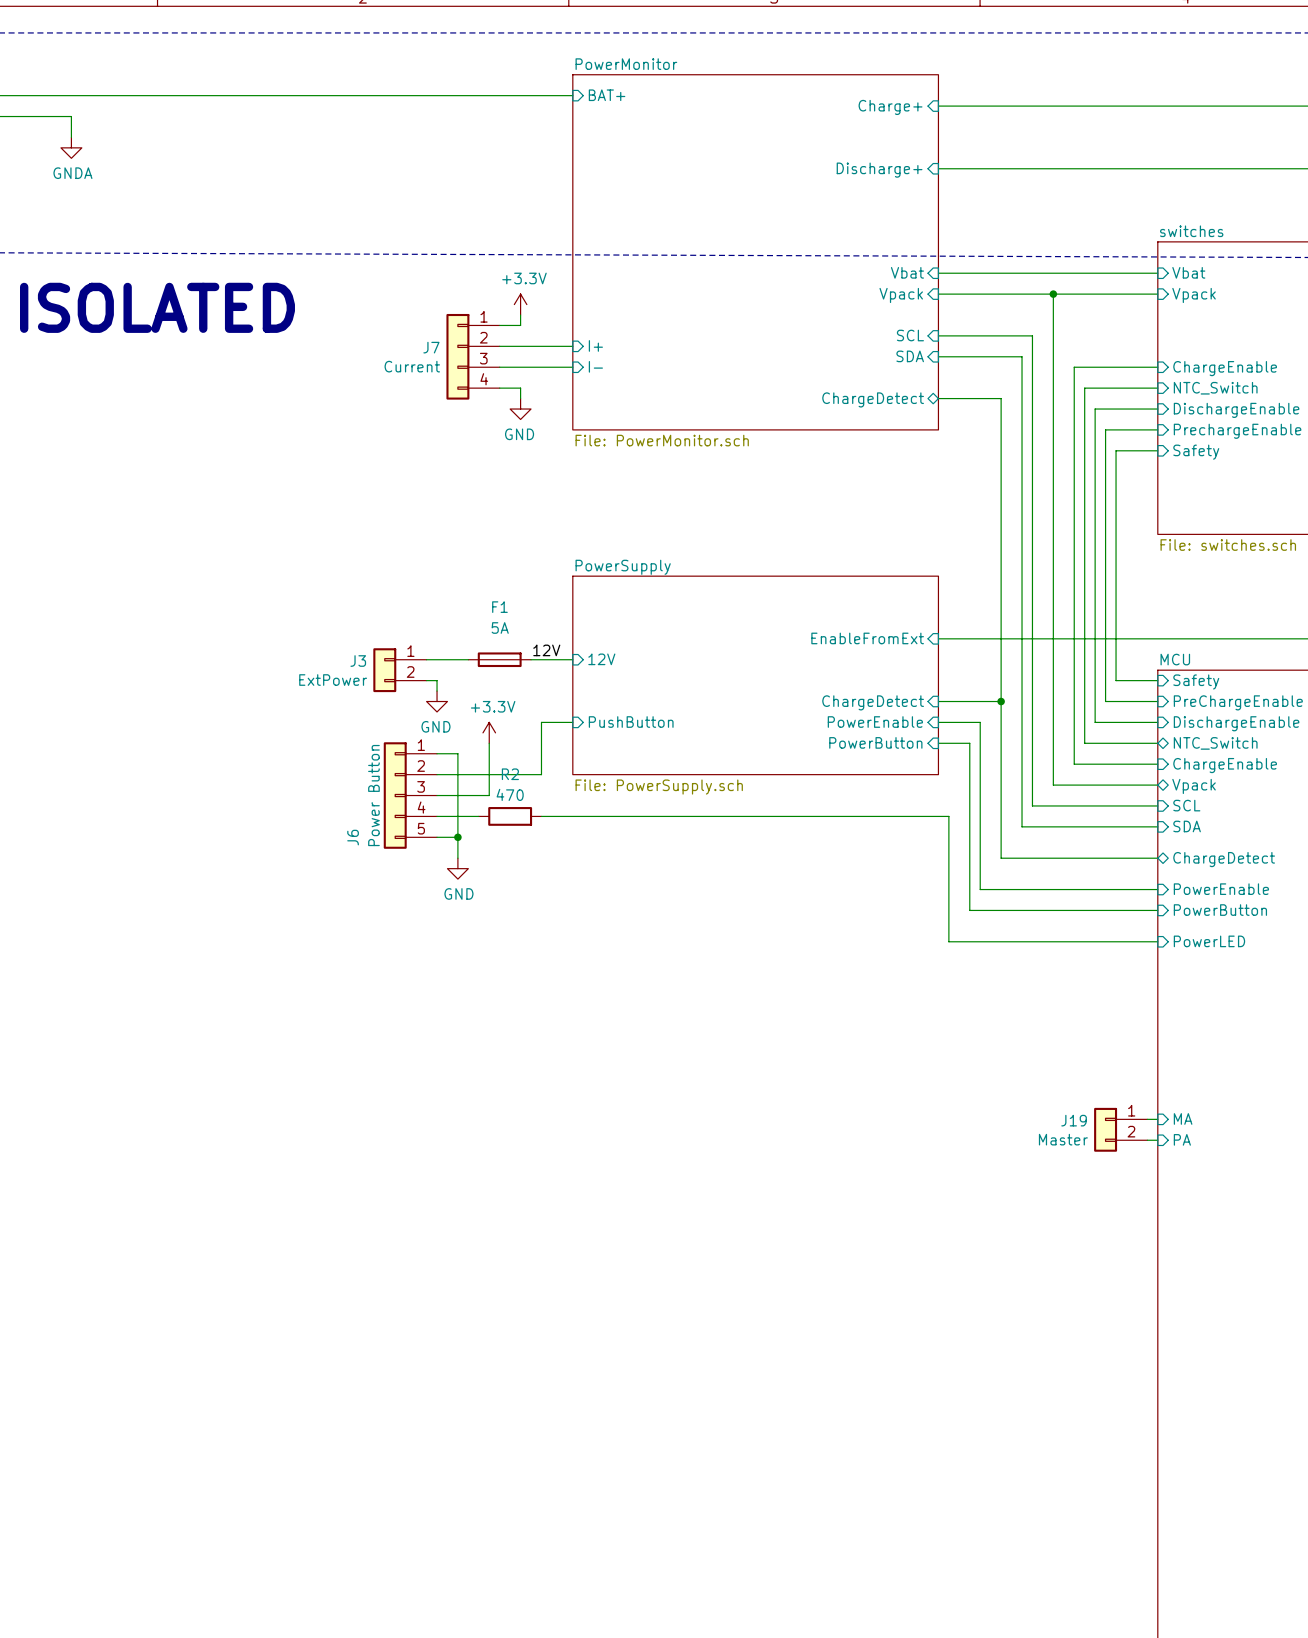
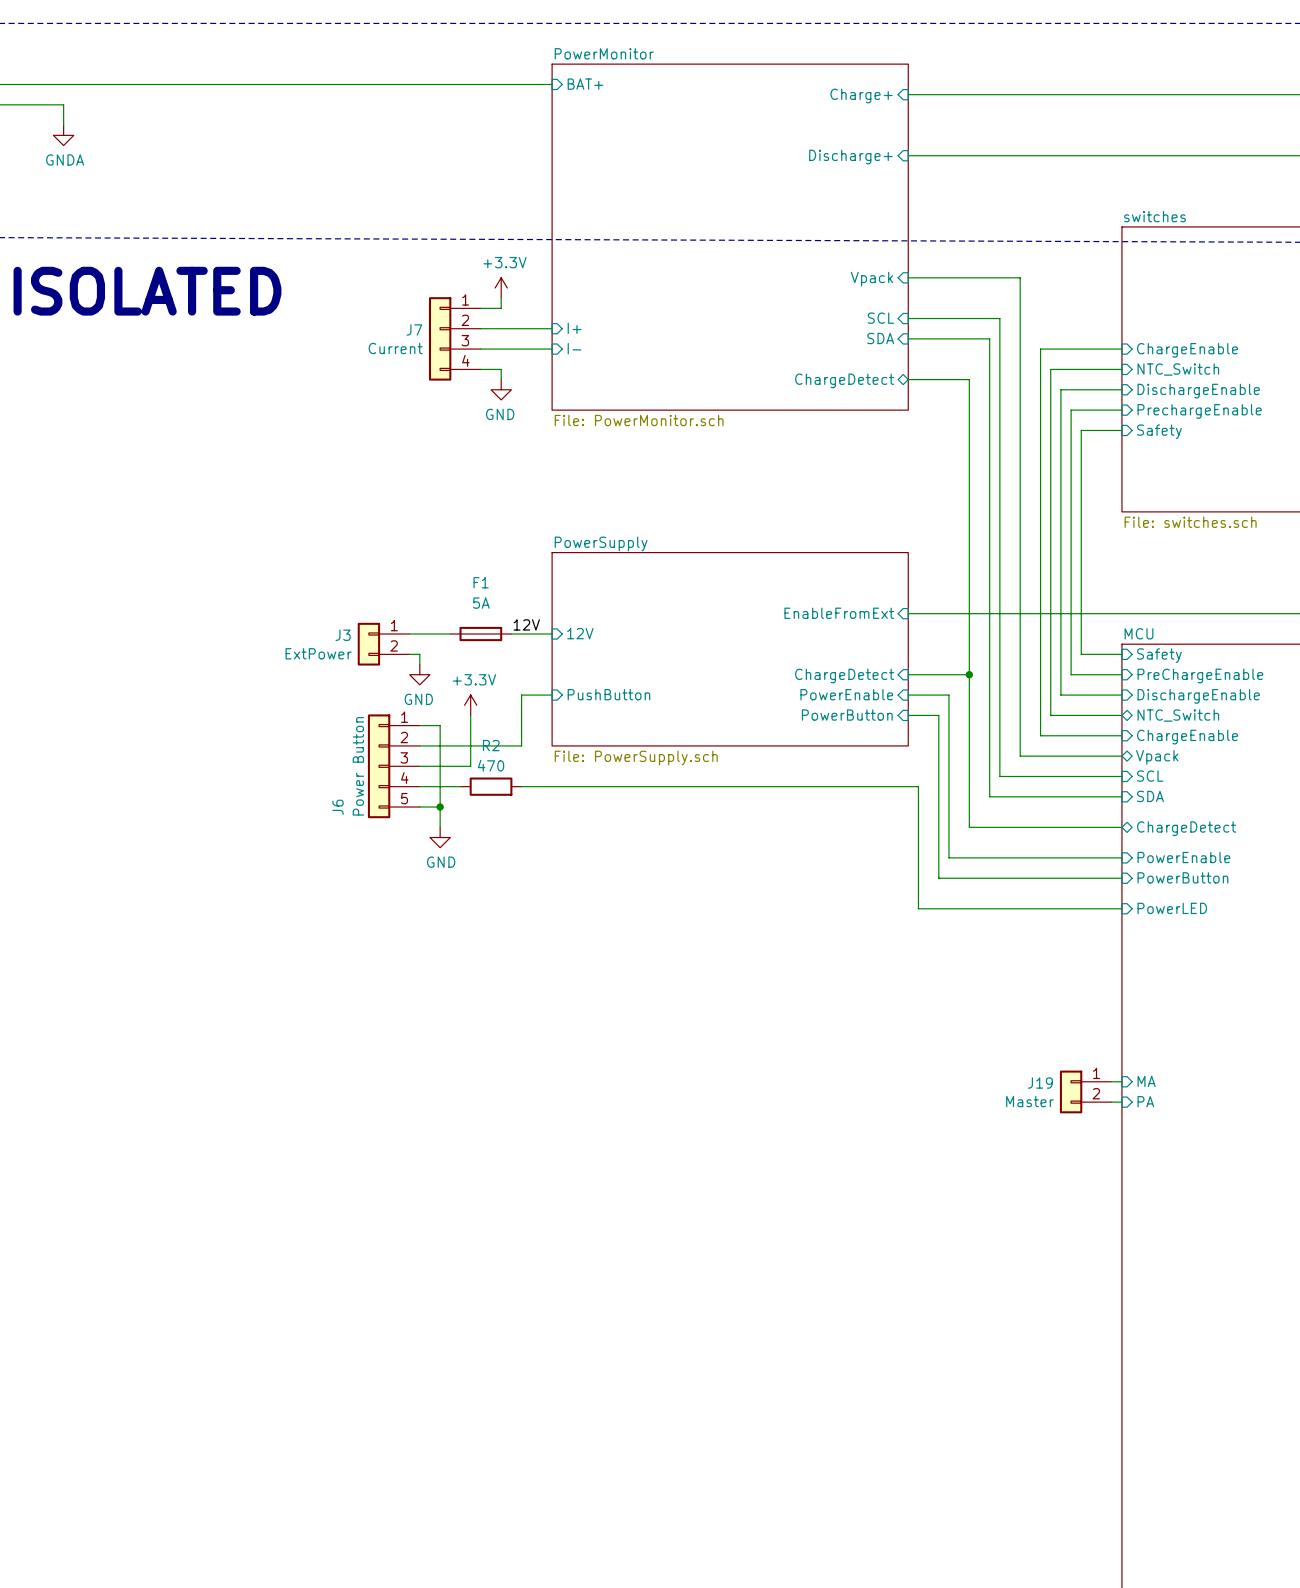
sheet pin: Vbat (907, 272) -> none
sheet pin: Vbat (1188, 272) -> none
wire: (938, 273) (1157, 273) -> none
wire: (1053, 294) (1157, 294) -> none
junction: (1053, 294) -> none
sheet pin: Vpack (1194, 295) -> none

